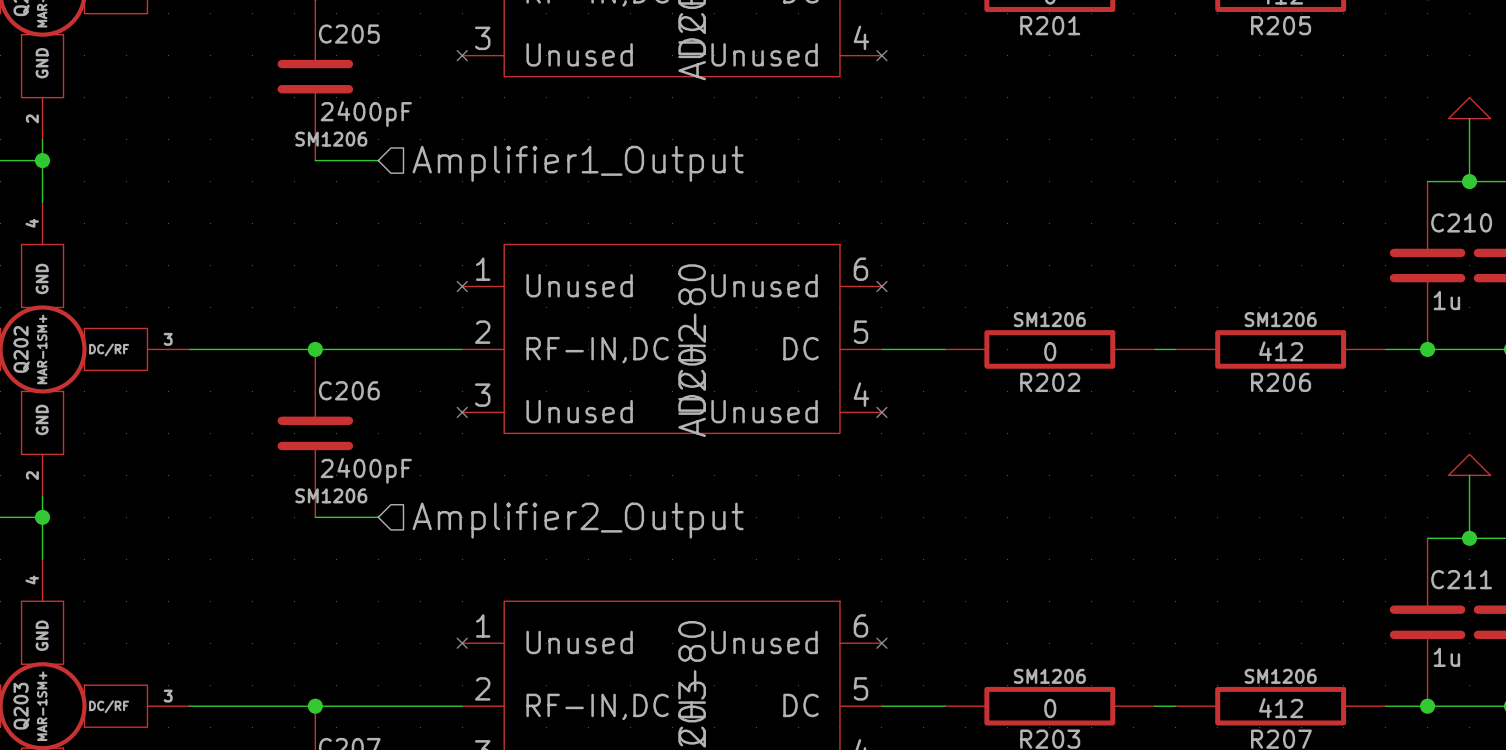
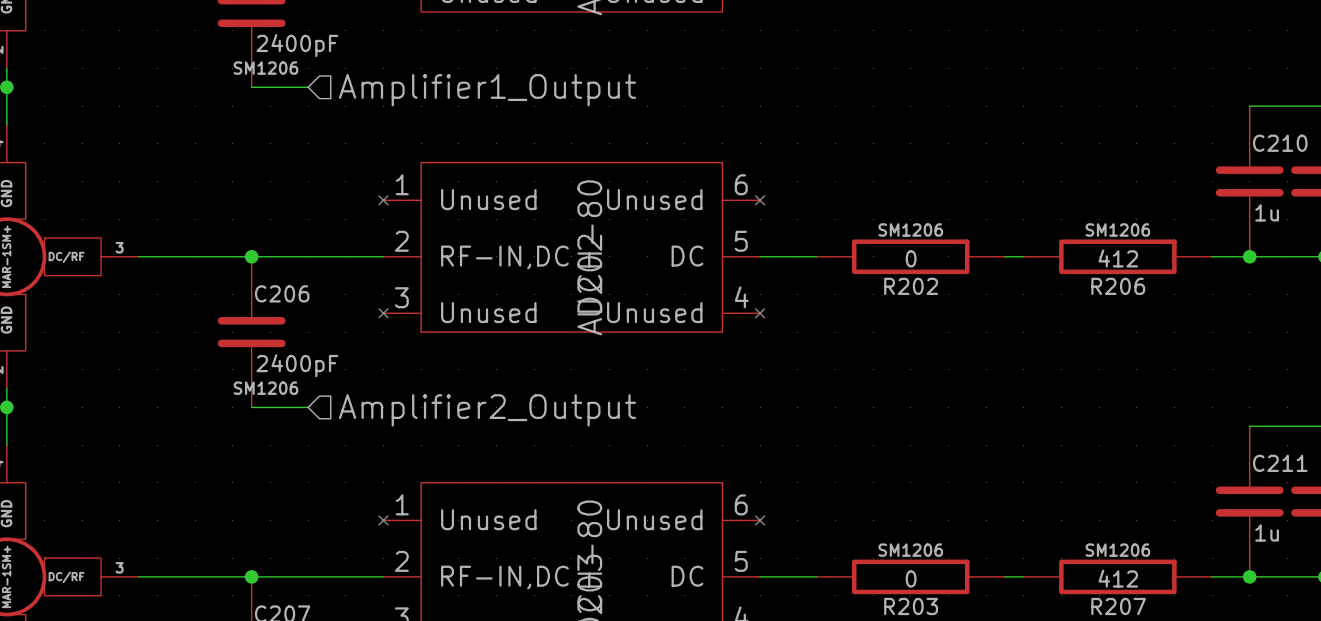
power symbol: (1469, 108) -> none
wire: (1469, 118) (1469, 181) -> none
junction: (1469, 181) -> none
power symbol: (1469, 464) -> none
wire: (1469, 475) (1469, 538) -> none
junction: (1469, 538) -> none

